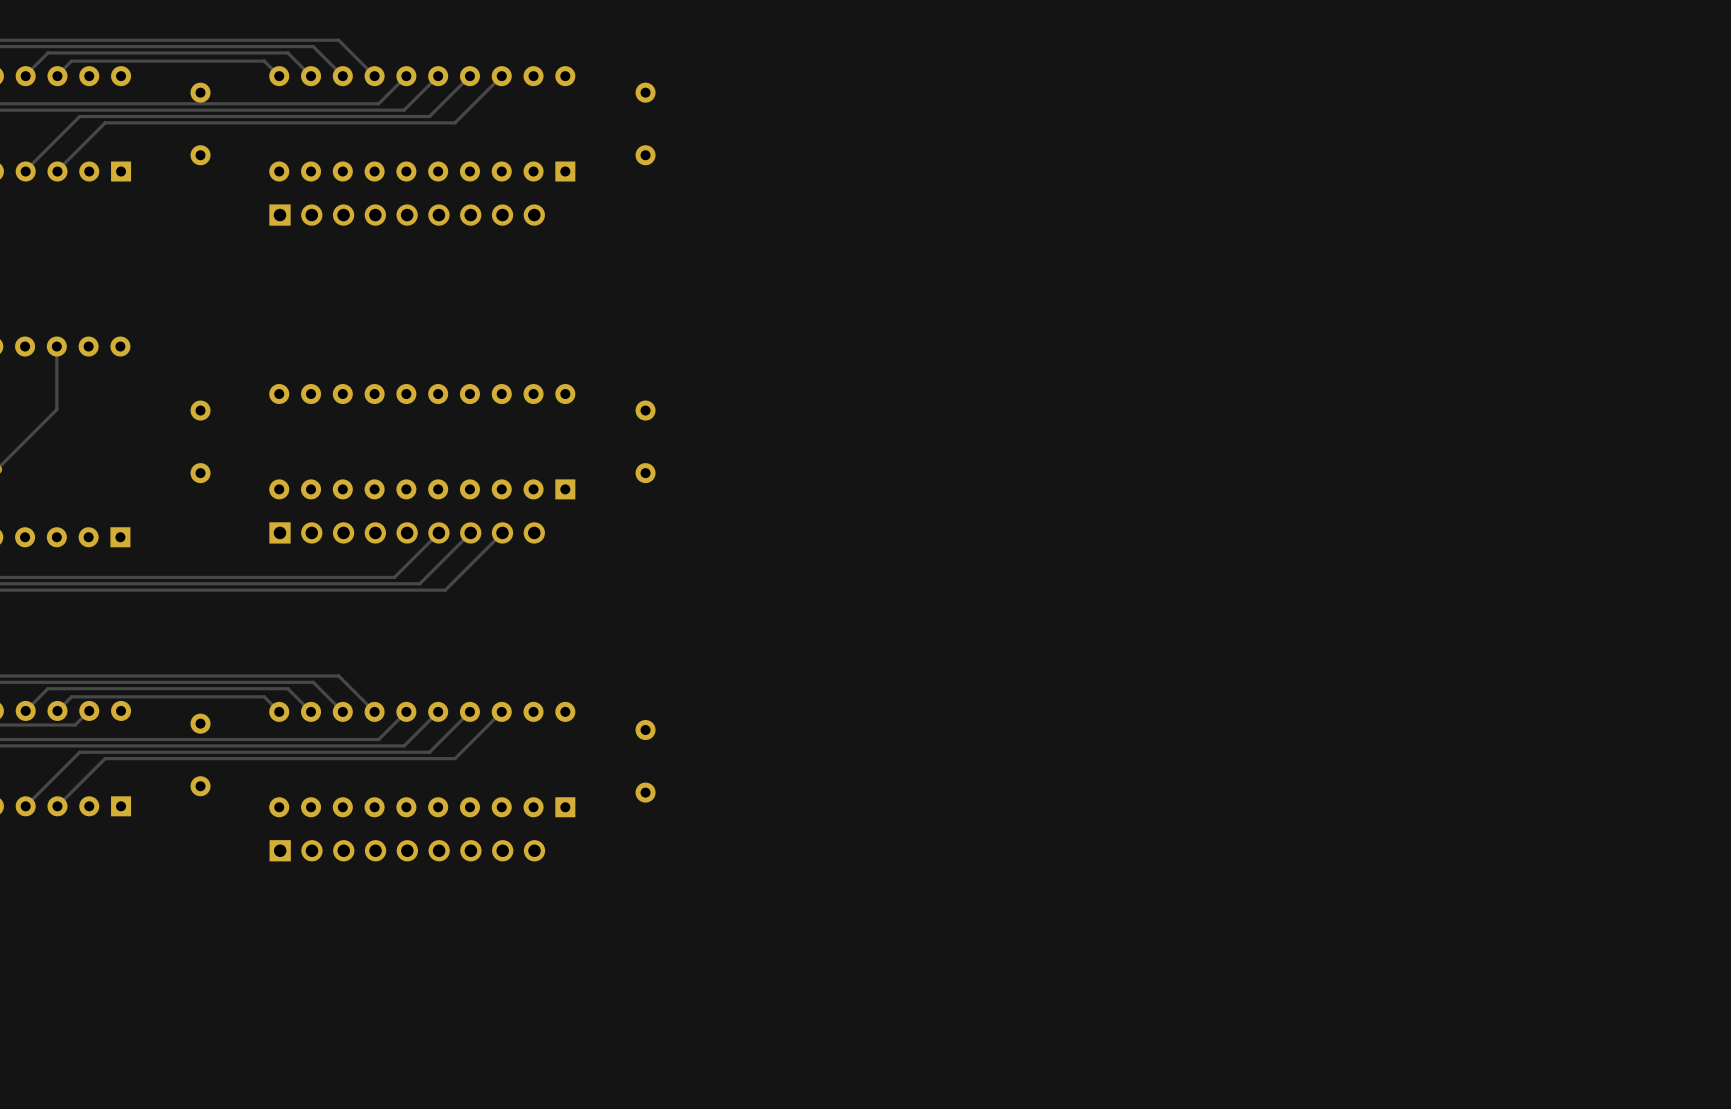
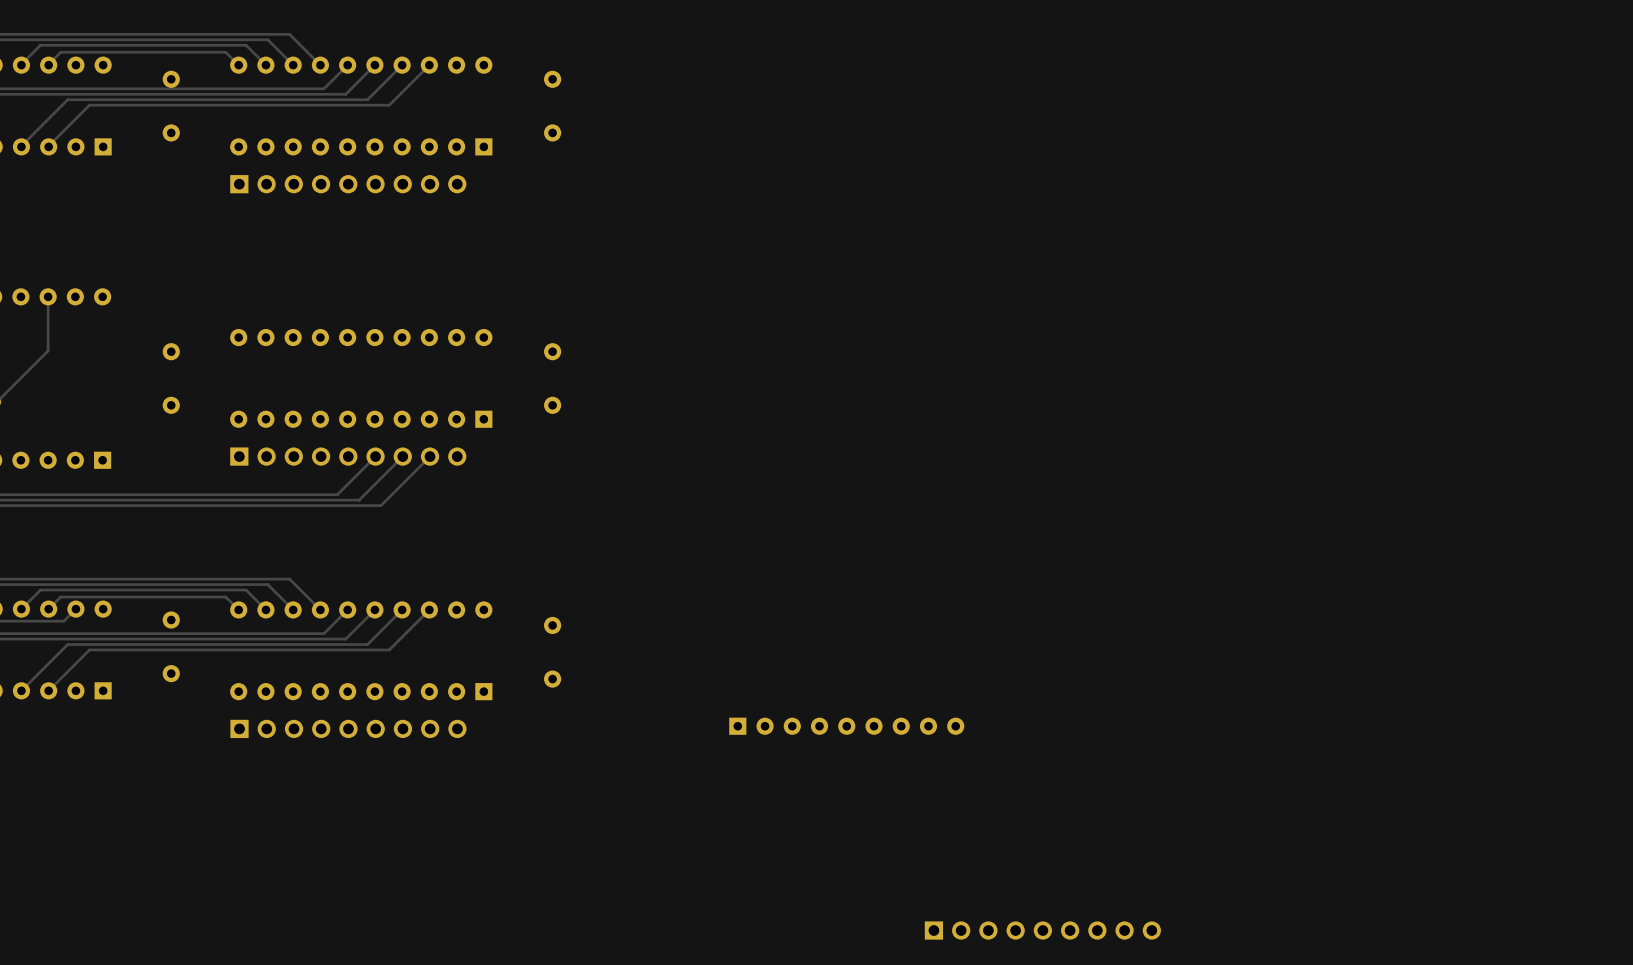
part: none -> (846, 726)
part: none -> (1042, 930)

